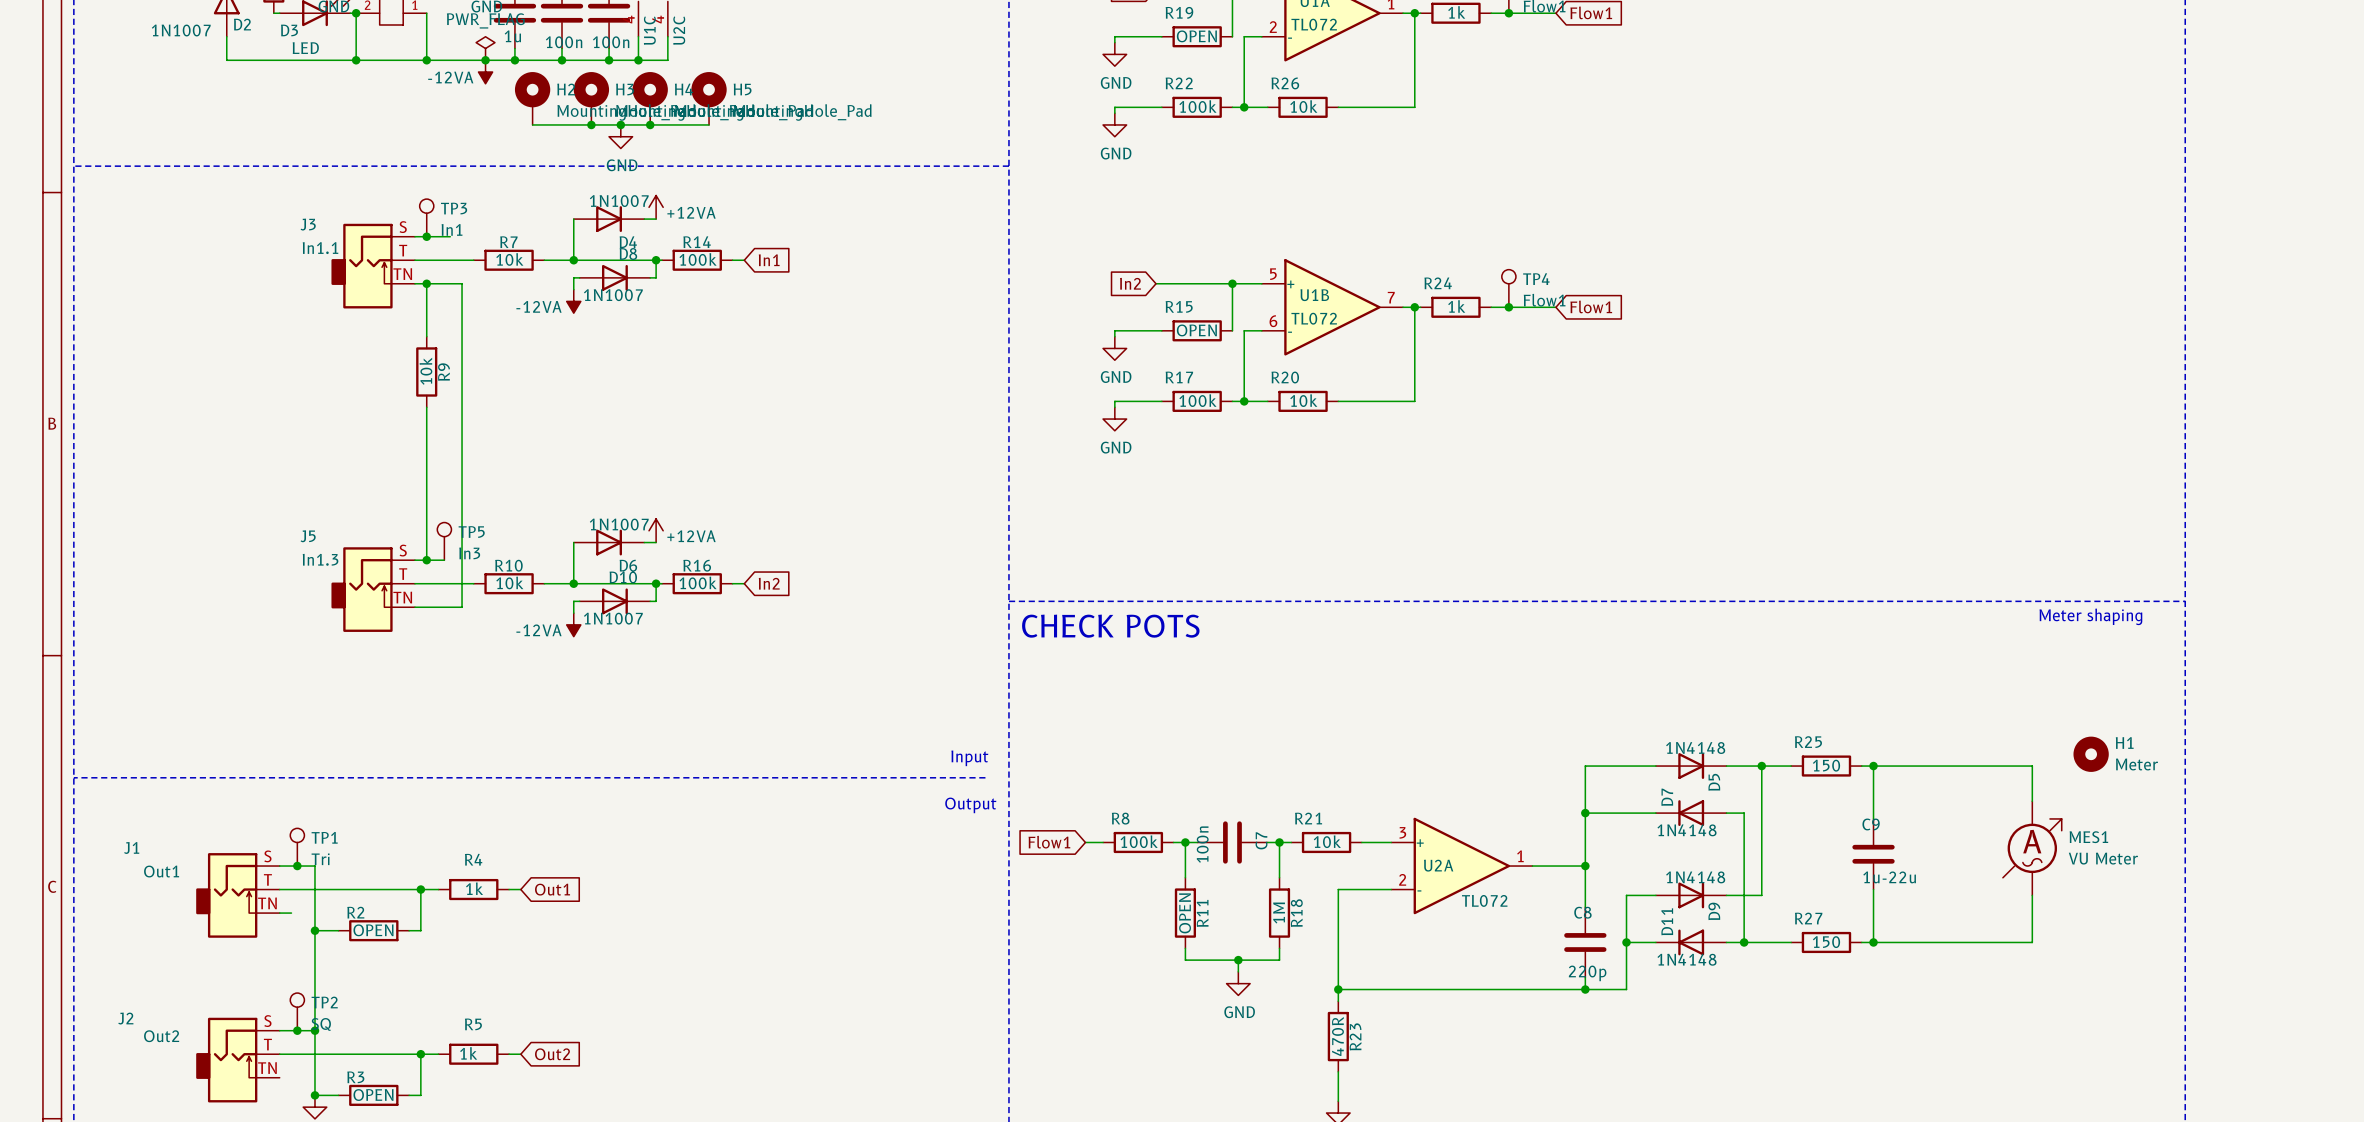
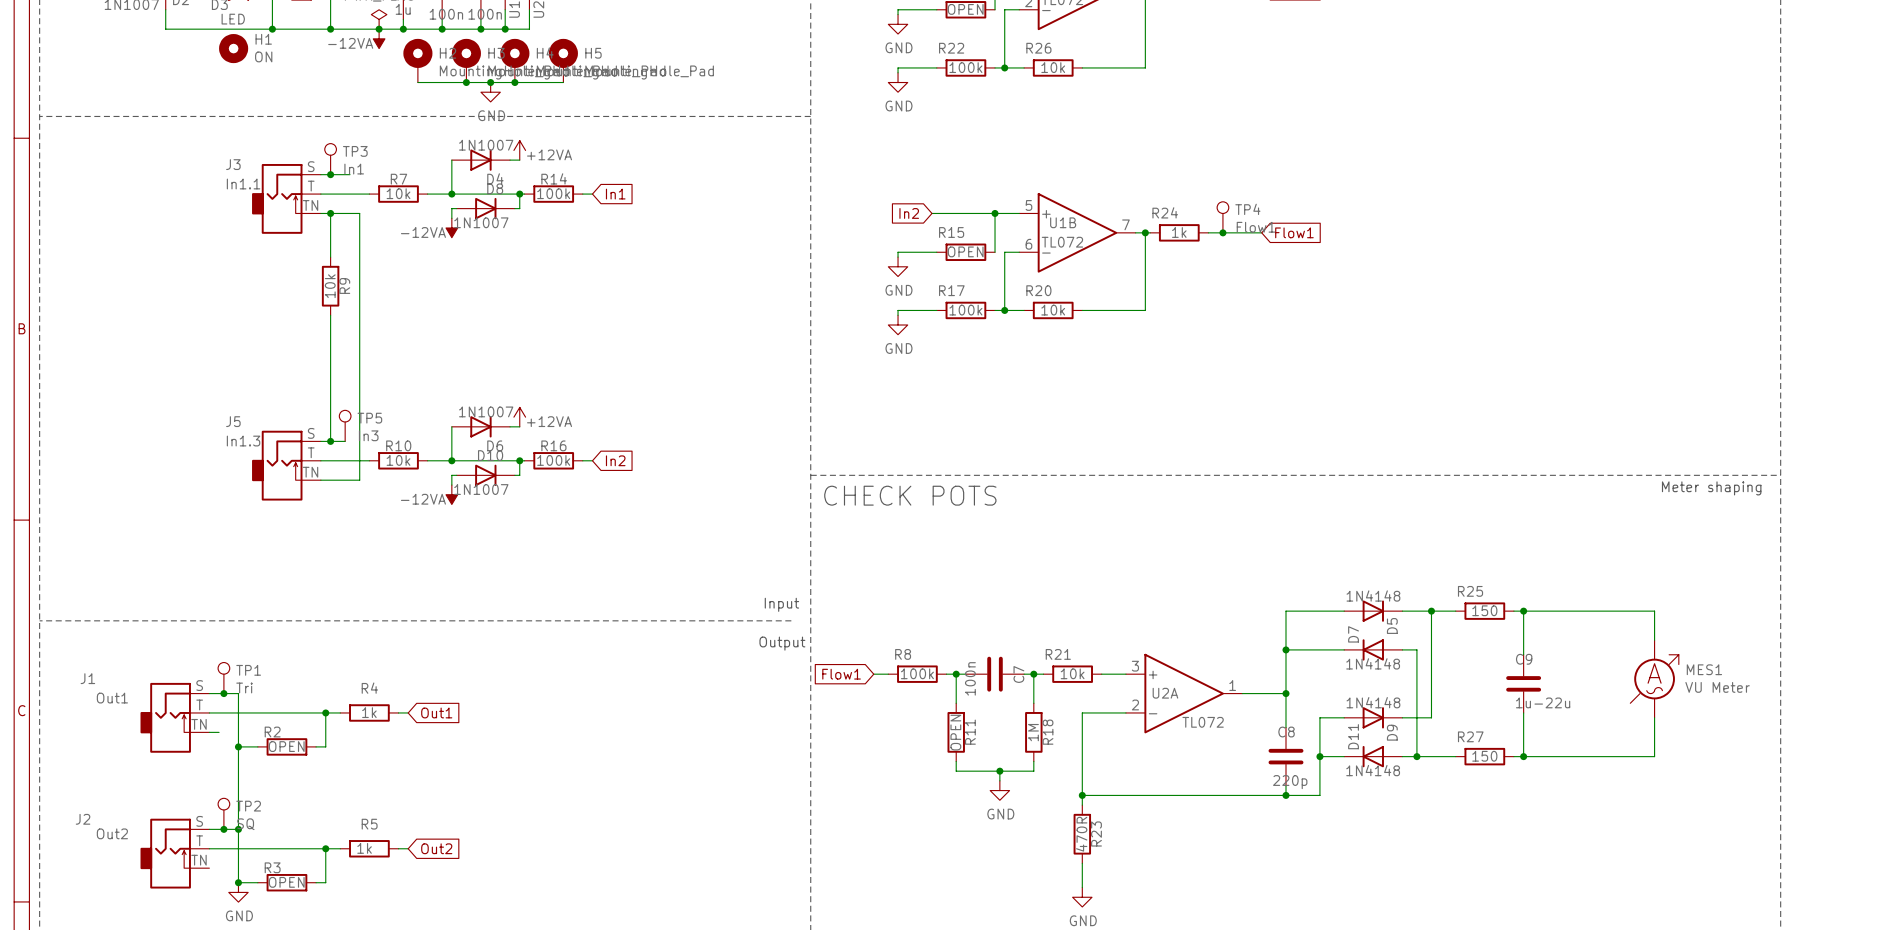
H1 position: (2091, 754) -> (233, 48)
H1 value: Meter (2136, 764) -> ON (263, 56)

